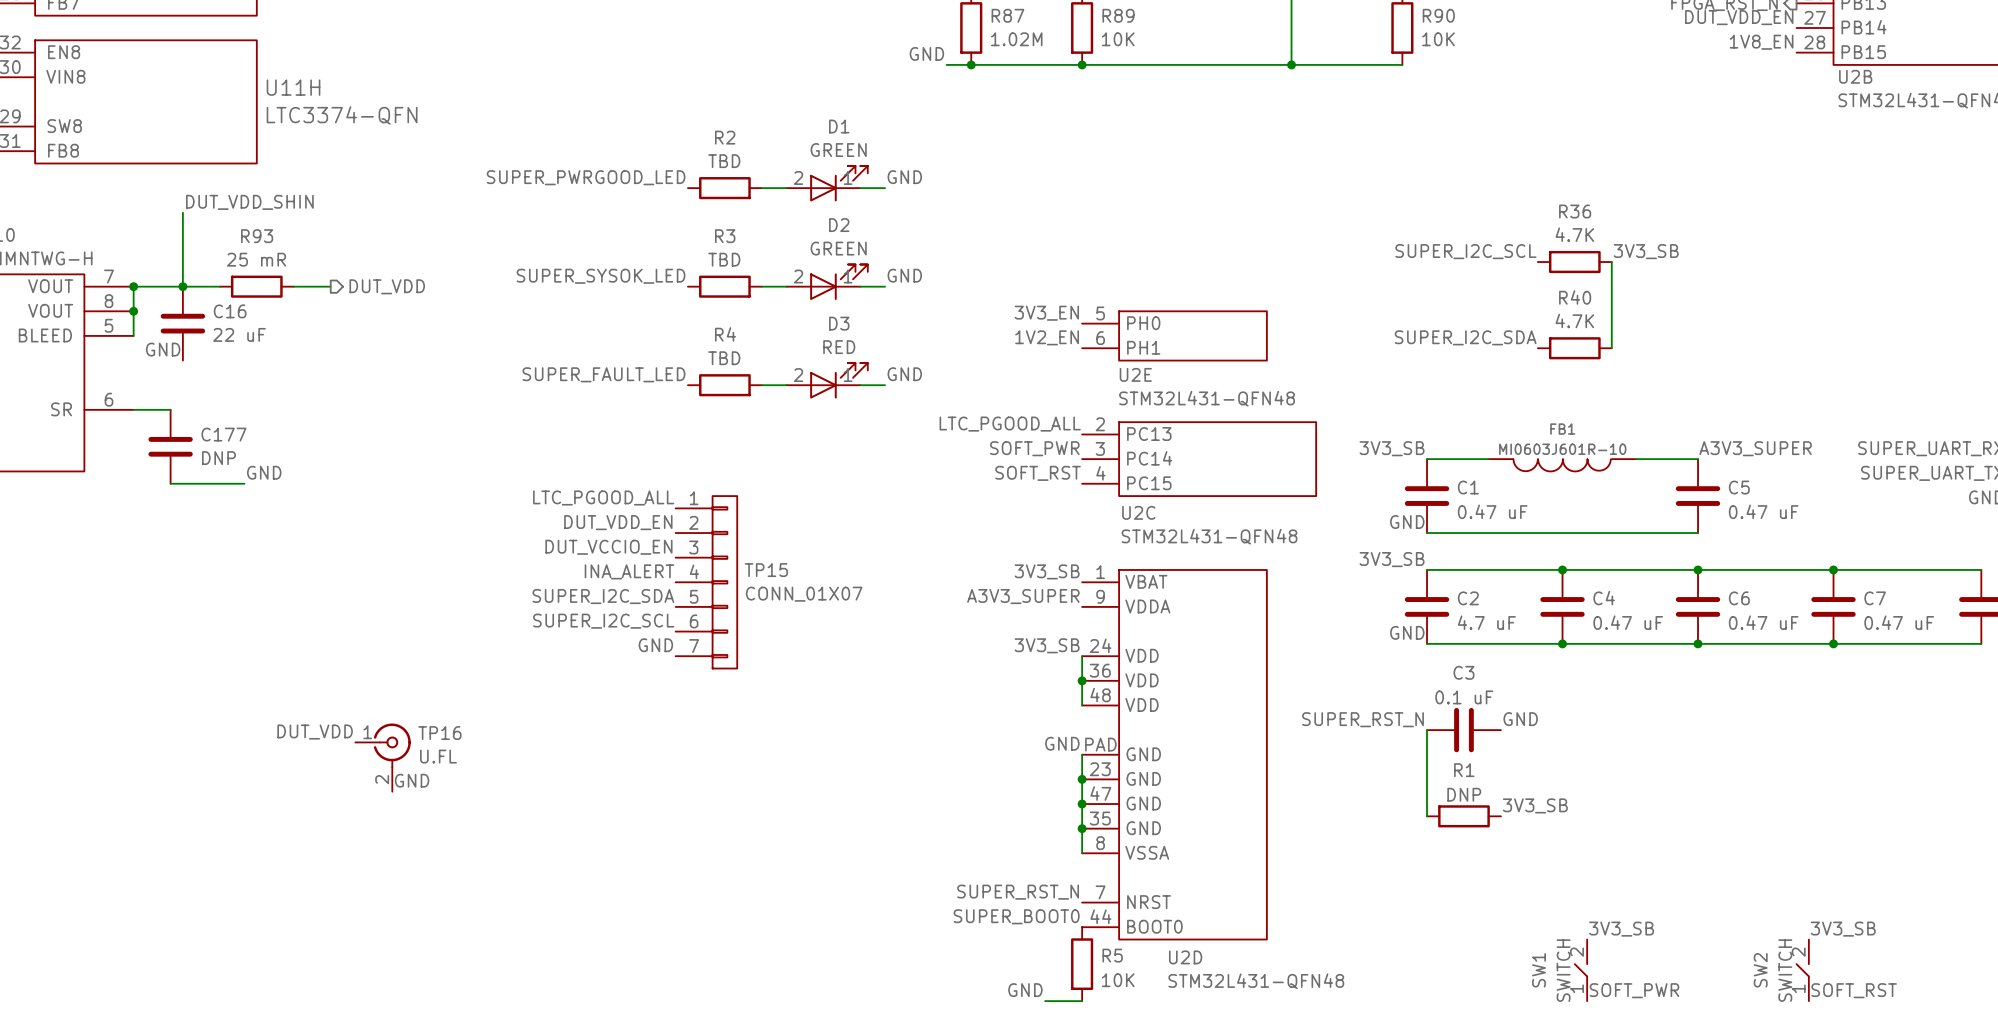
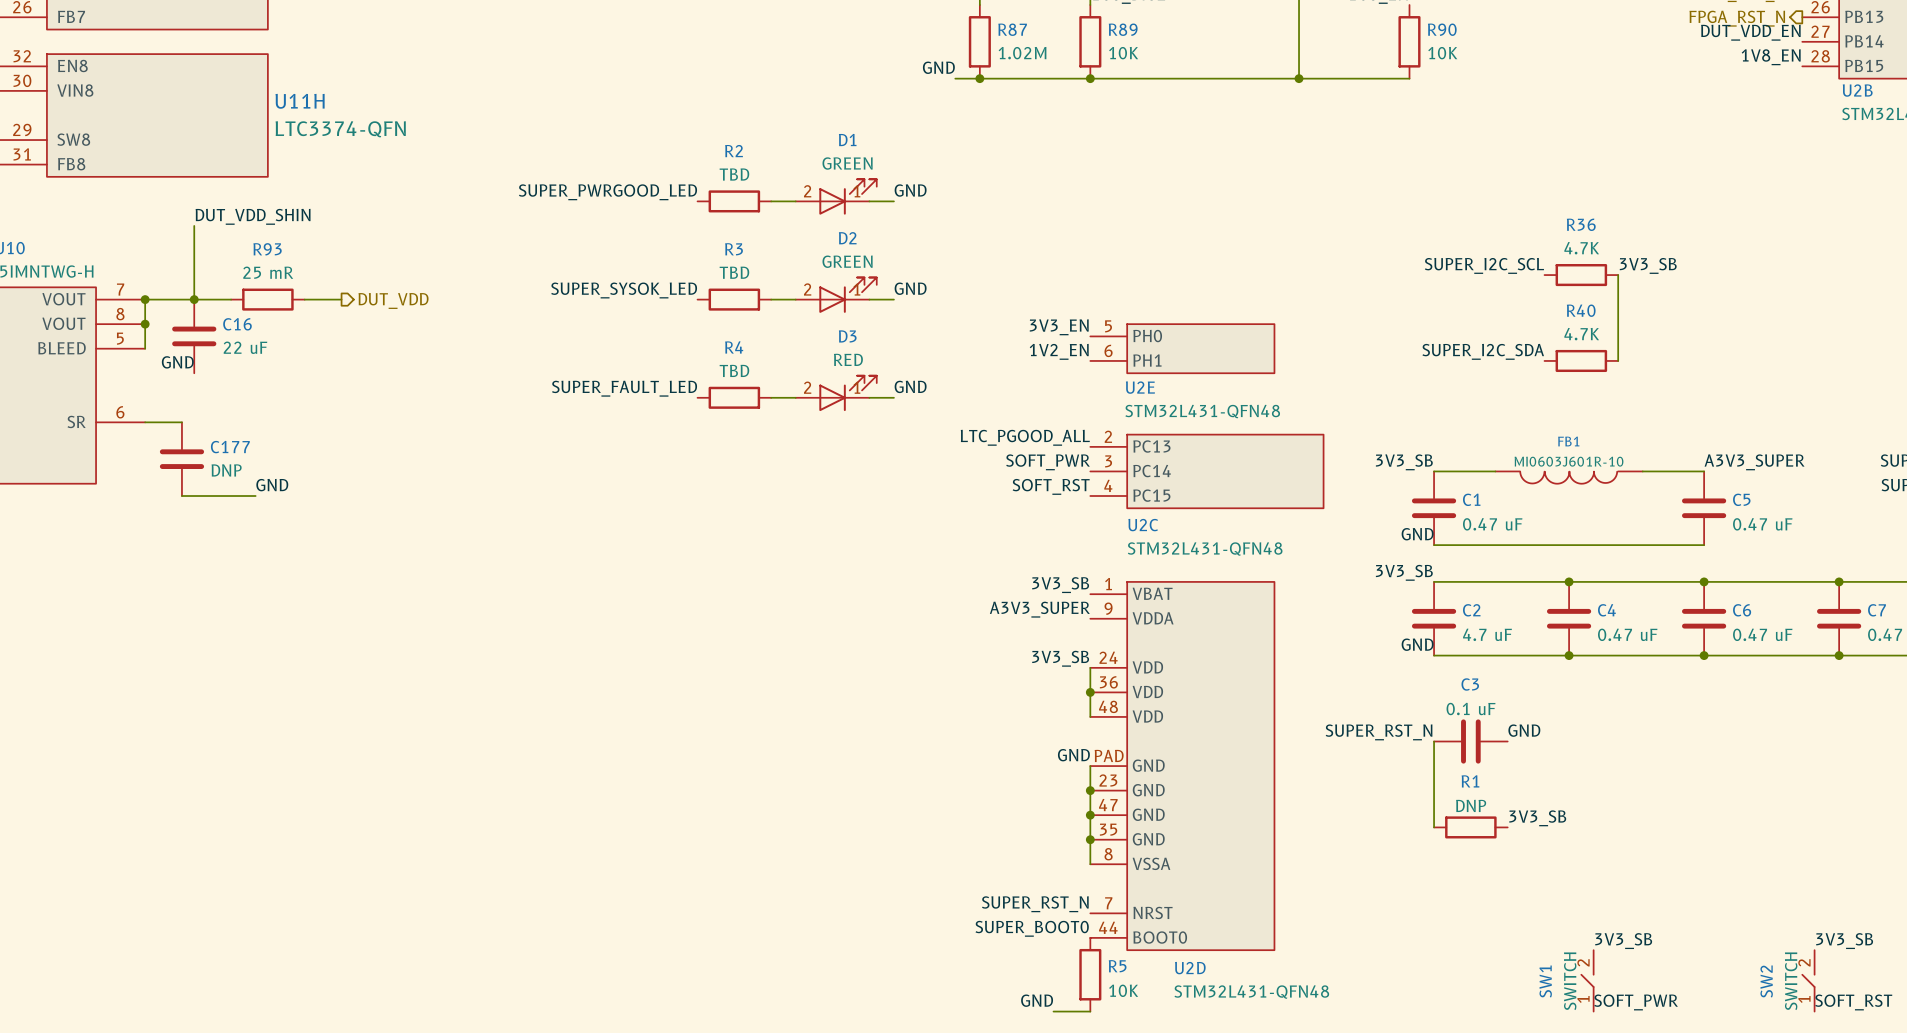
label: LTC_PGOOD_ALL (603, 497) -> none
label: DUT_VDD_EN (618, 522) -> none
label: DUT_VCCIO_EN (608, 547) -> none
label: INA_ALERT (629, 571) -> none
TP15: CONN_01X07 (706, 582) -> none
label: SUPER_I2C_SDA (603, 596) -> none
label: SUPER_I2C_SCL (603, 621) -> none
label: GND (655, 645) -> none
label: DUT_VDD (315, 732) -> none
TP16: U.FL (383, 757) -> none
label: GND (412, 780) -> none

